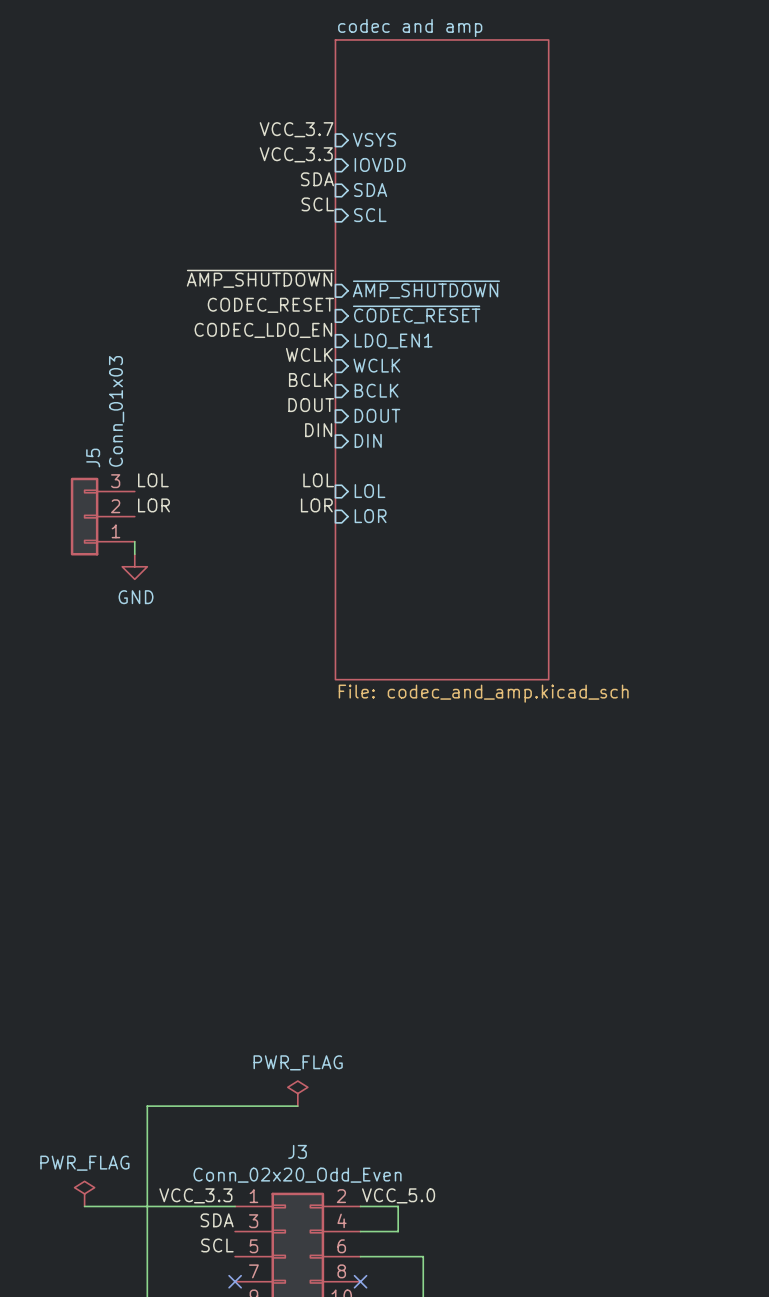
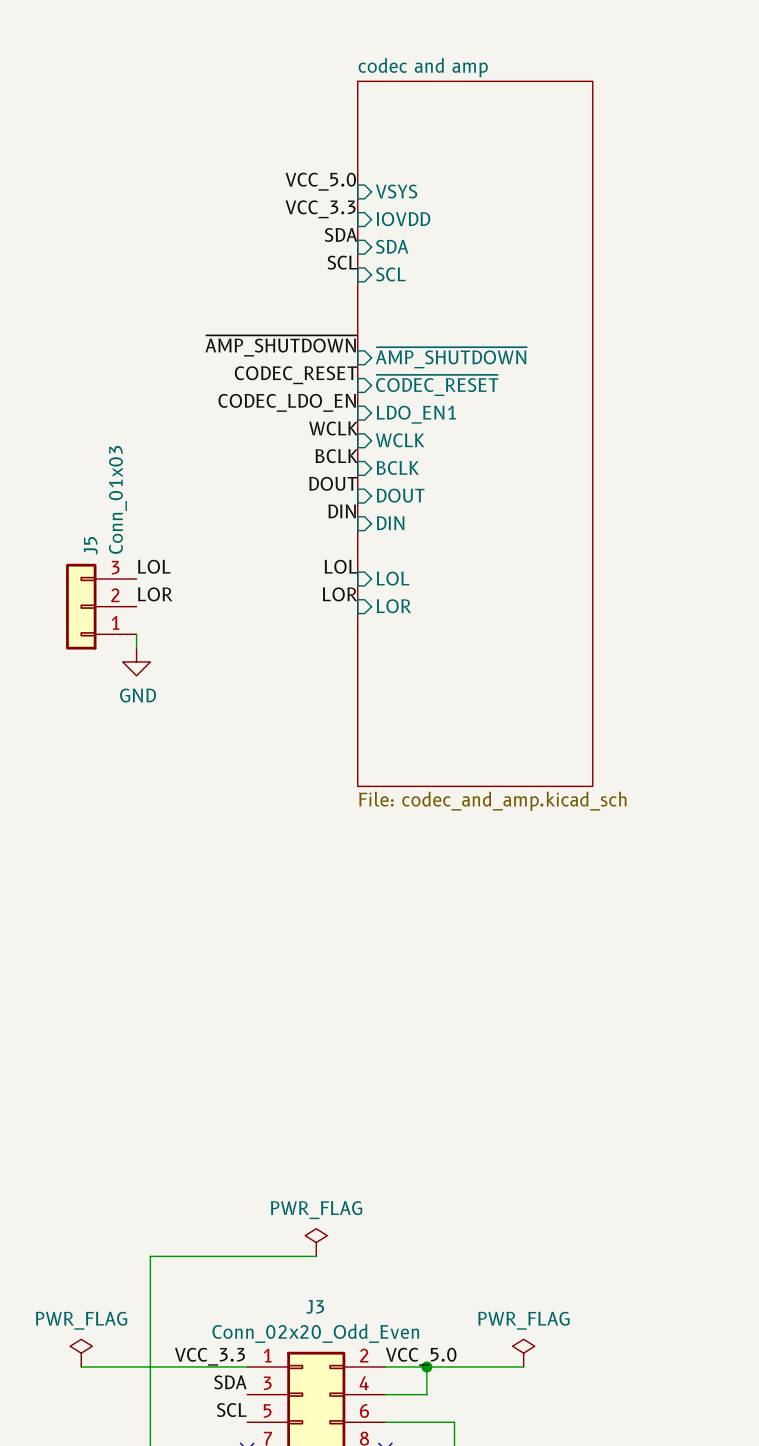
label: VCC_3.7 (296, 129) -> VCC_5.0 (320, 181)
power symbol: none -> PWR_FLAG (523, 1353)
wire: none -> (426, 1366) (523, 1366)
junction: none -> (426, 1366)

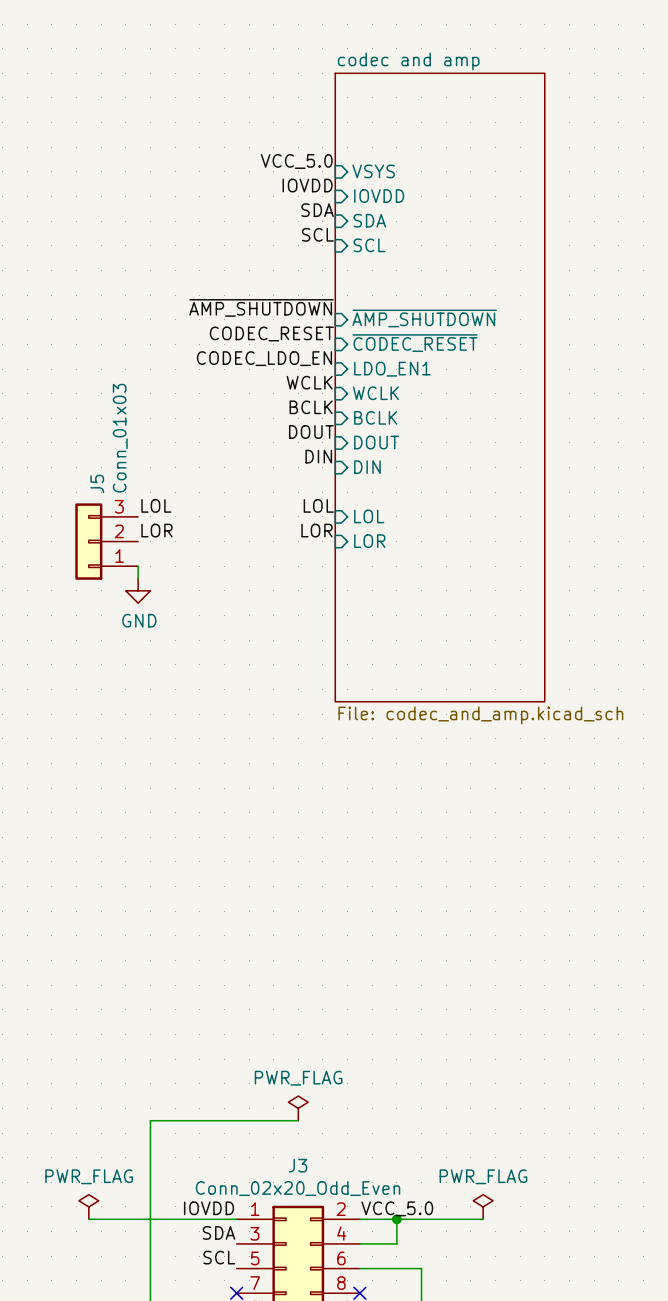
label: VCC_3.3 (320, 209) -> IOVDD (307, 185)
label: VCC_3.3 (209, 1356) -> IOVDD (209, 1208)

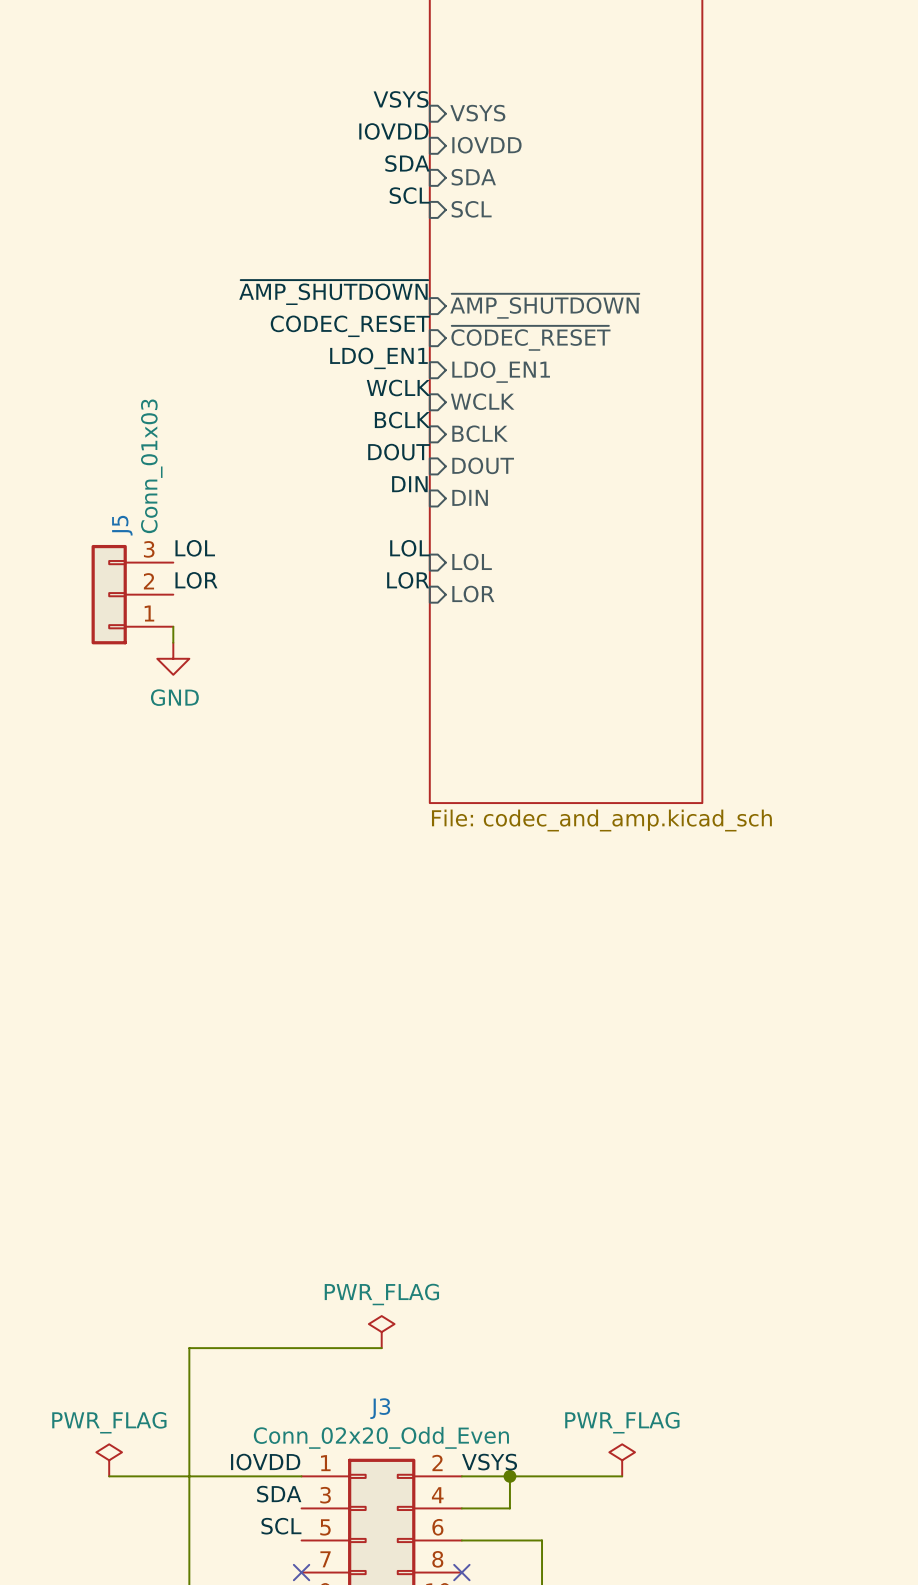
label: VCC_5.0 (296, 161) -> VSYS (401, 99)
label: CODEC_LDO_EN (264, 358) -> LDO_EN1 (378, 358)
label: VCC_5.0 (397, 1208) -> VSYS (489, 1462)

